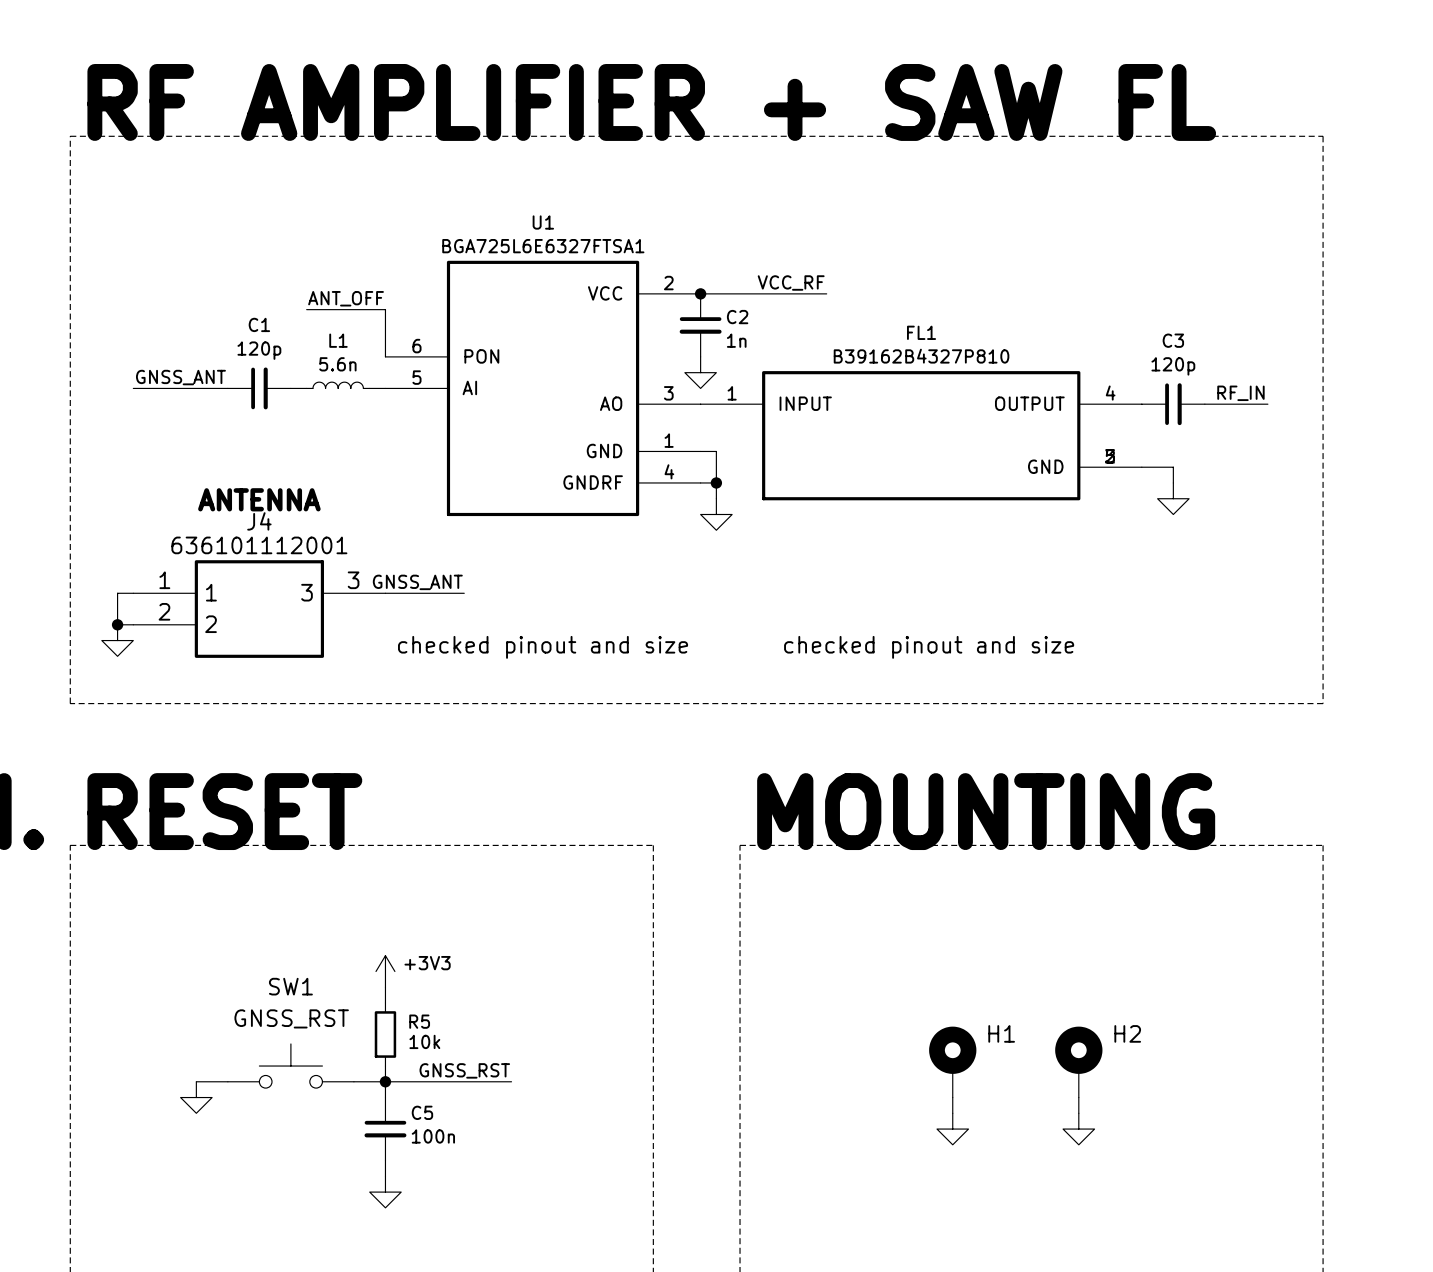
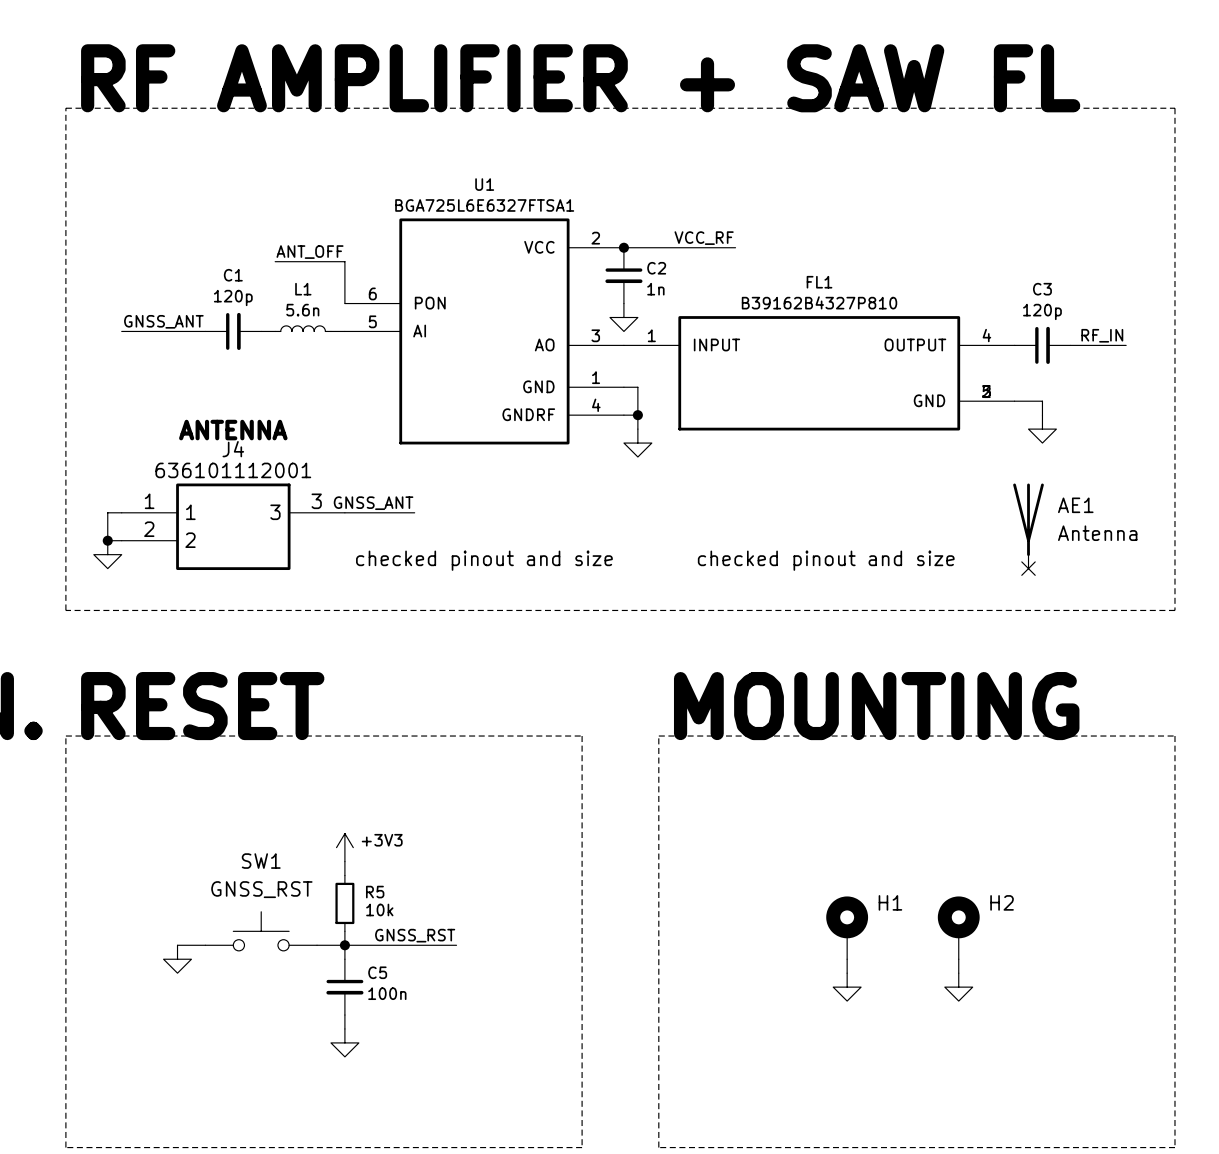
AE1: none -> Antenna (1028, 526)
no-connect mark: none -> (1028, 568)

